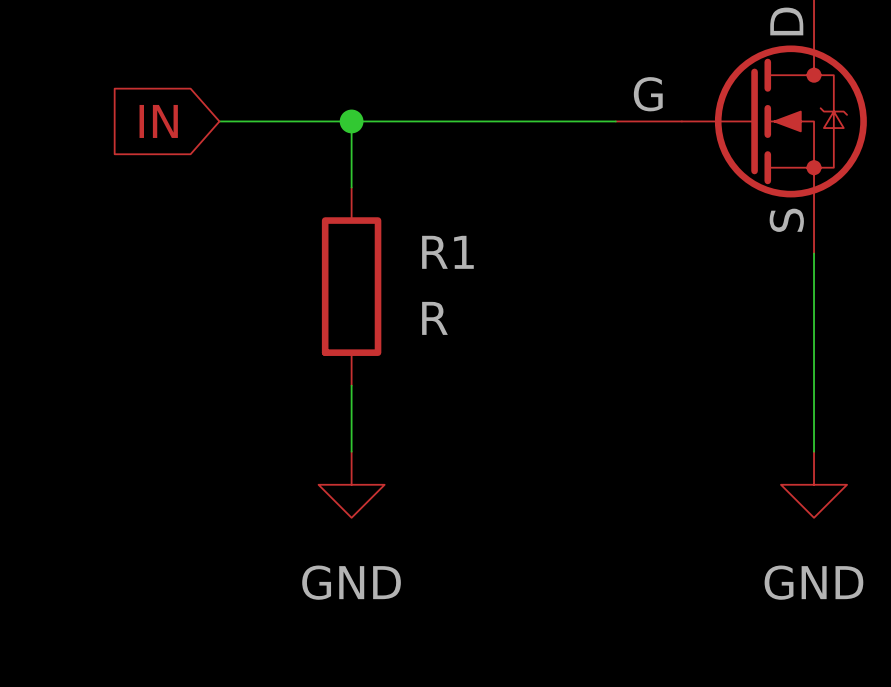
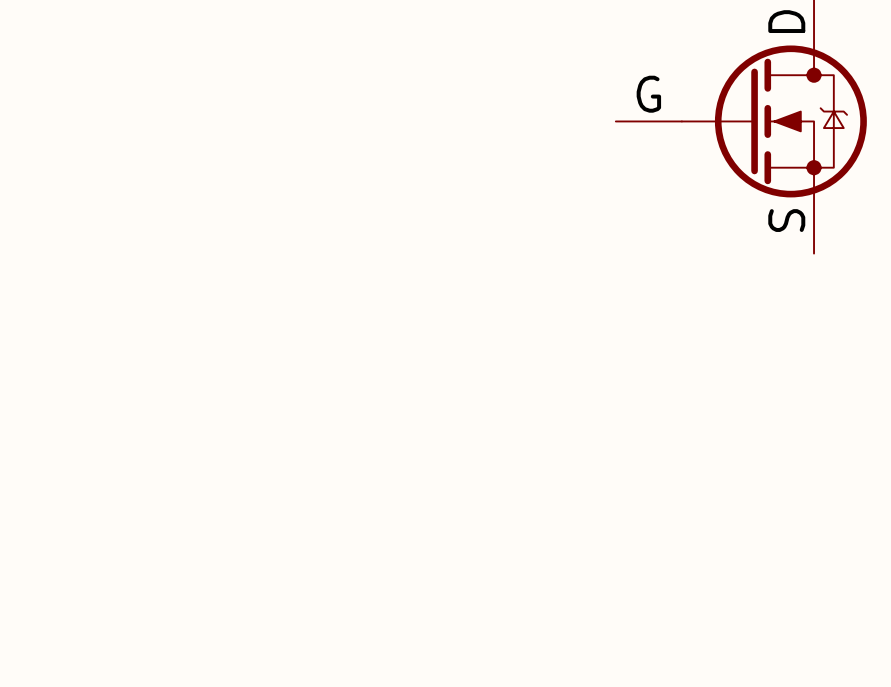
global label: IN (158, 121) -> none
wire: (219, 121) (615, 121) -> none
wire: (351, 121) (351, 187) -> none
junction: (351, 121) -> none
wire: (814, 253) (814, 451) -> none
R1: R (351, 286) -> none
wire: (351, 385) (351, 451) -> none
power symbol: GND (351, 484) -> none
power symbol: GND (814, 484) -> none

